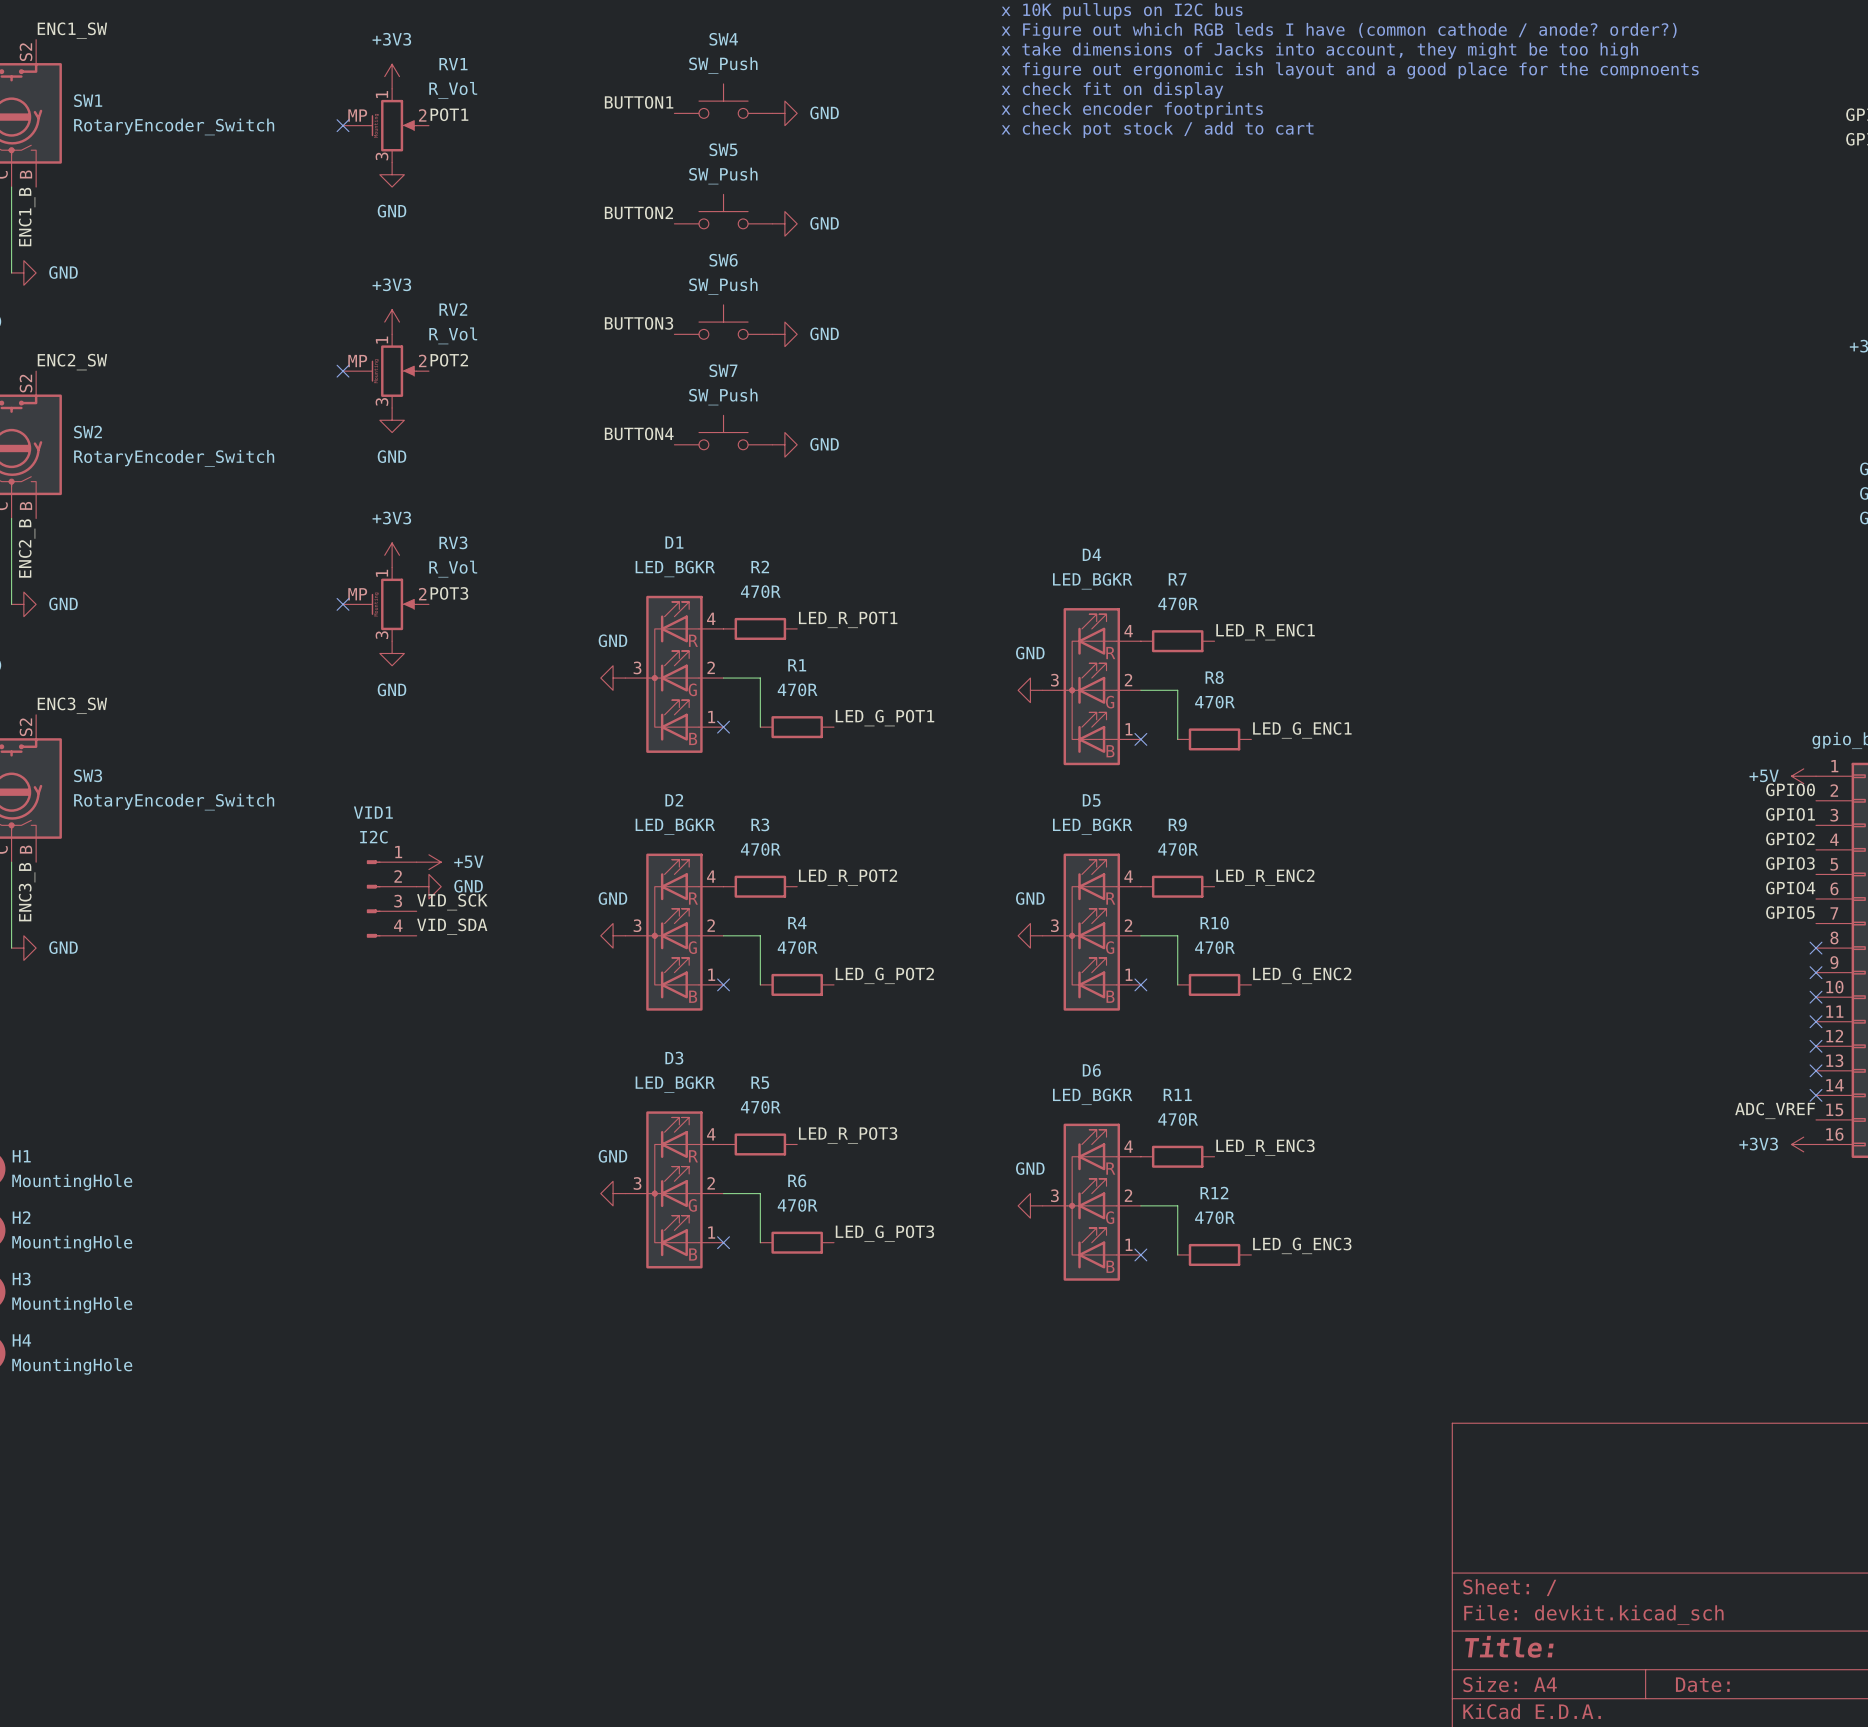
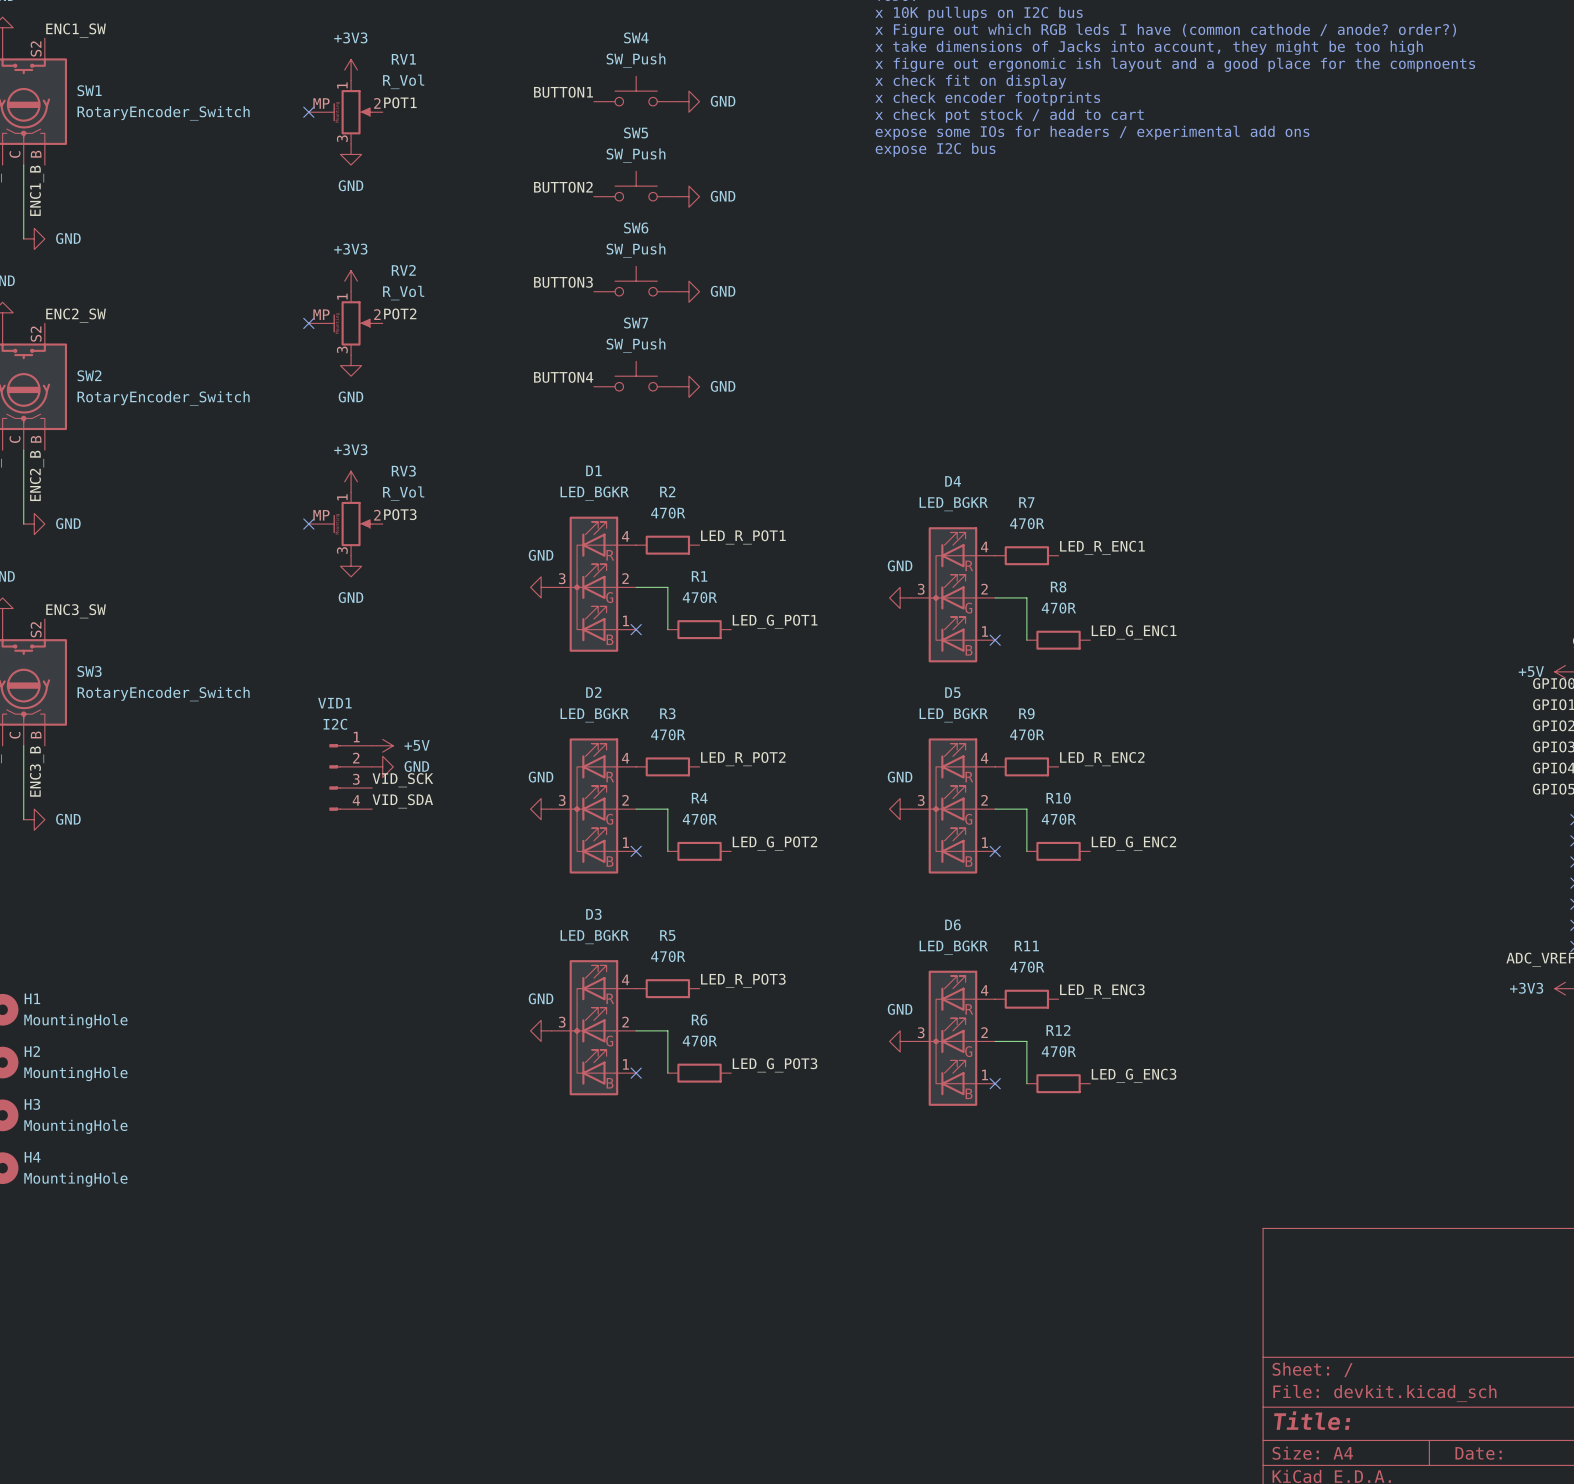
text: none -> expose some IOs for headers / experimental add ons (1092, 132)
text: none -> expose I2C bus (935, 149)

